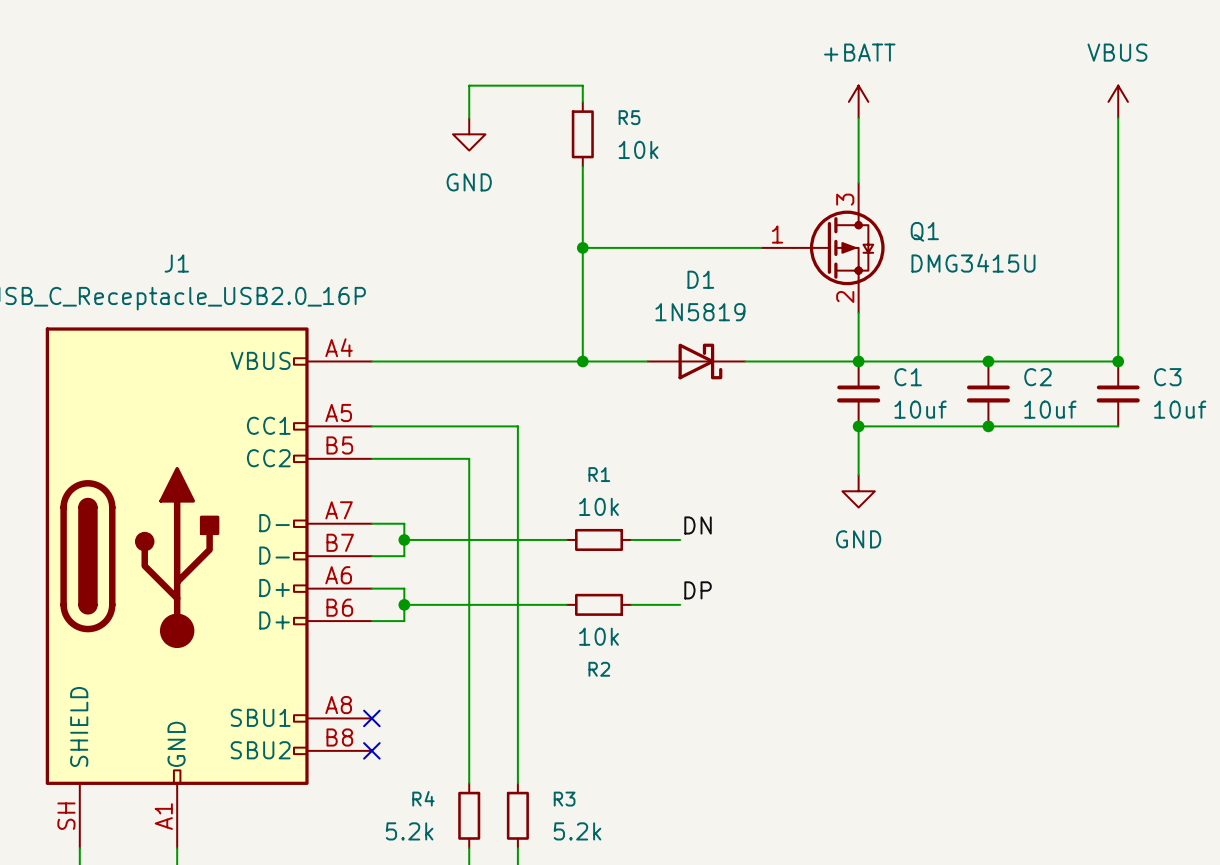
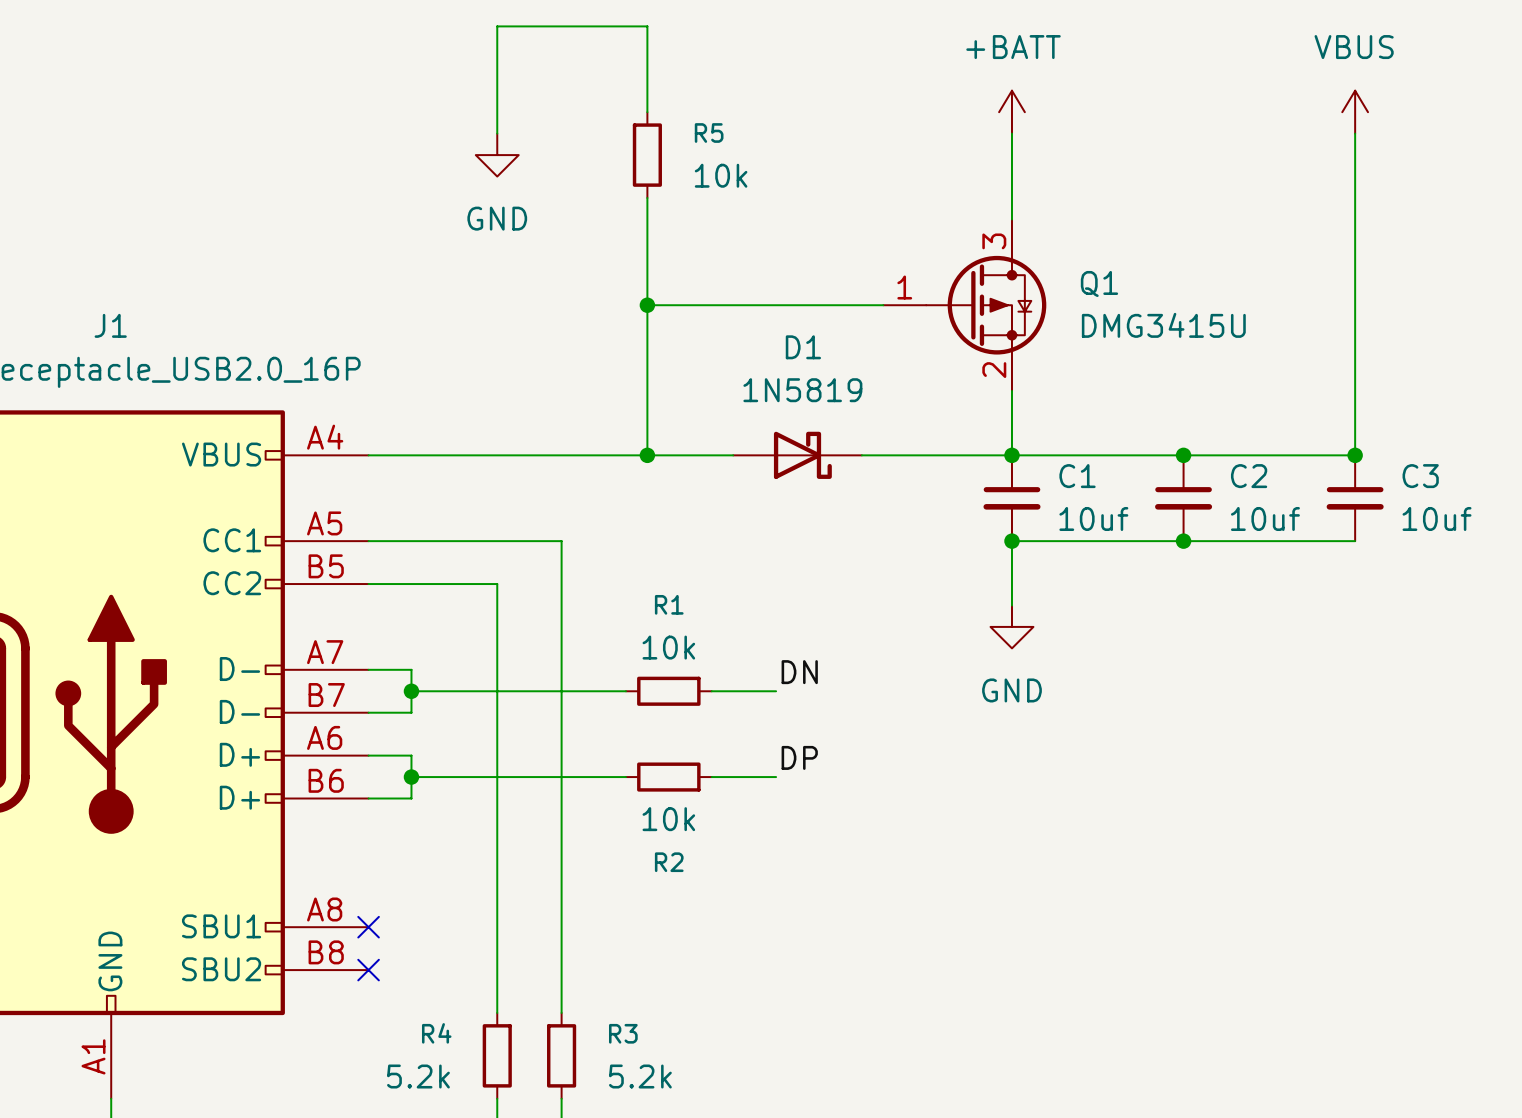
wire: (469, 85) (582, 85) -> (497, 90) (497, 26) (647, 26) (647, 90)

